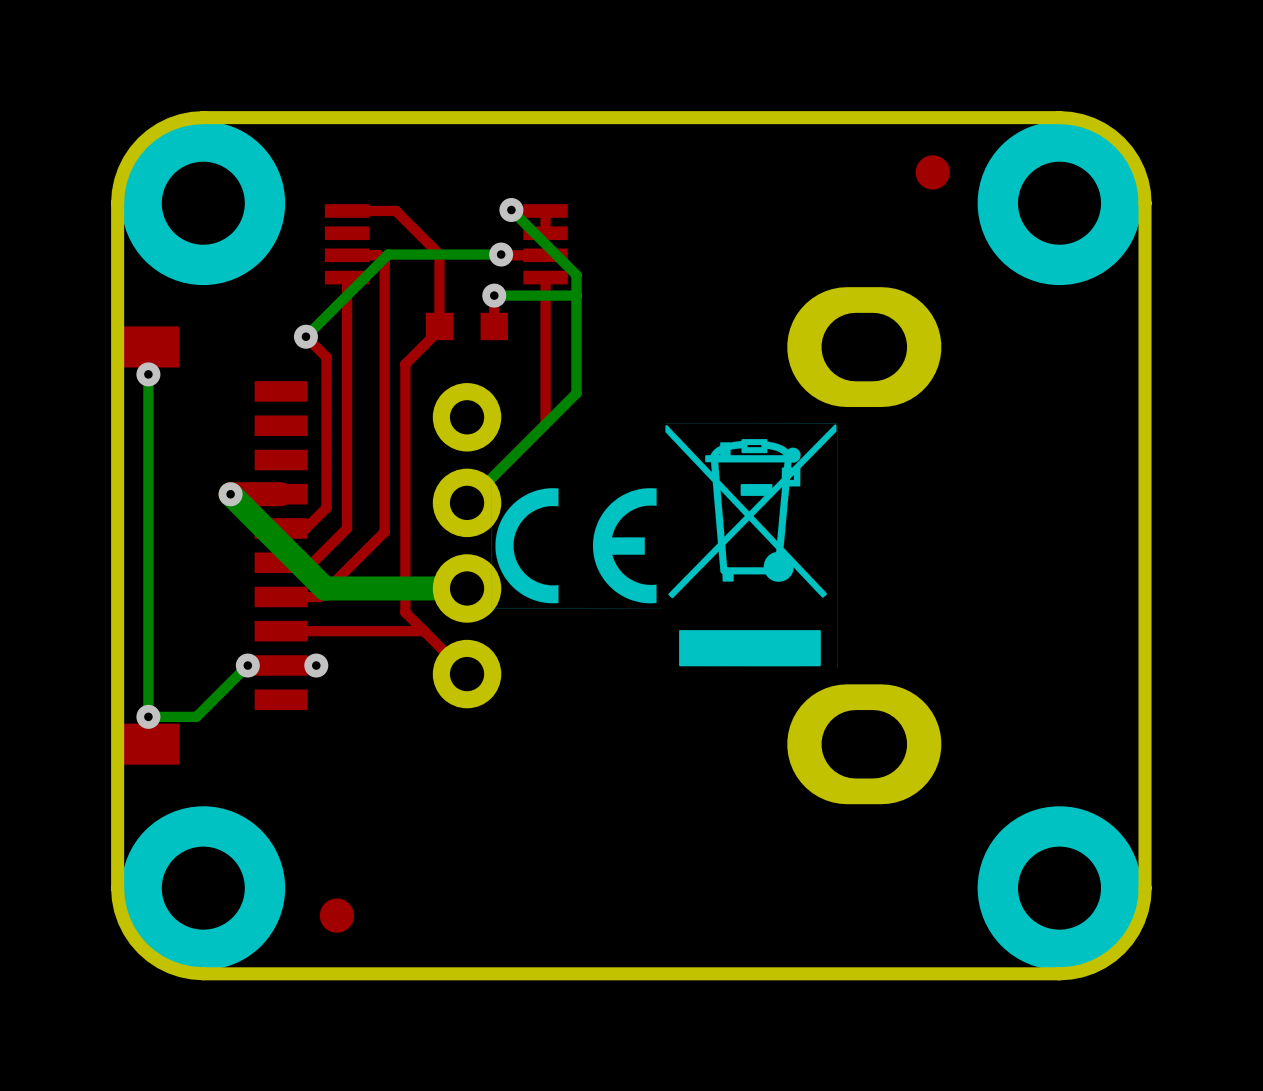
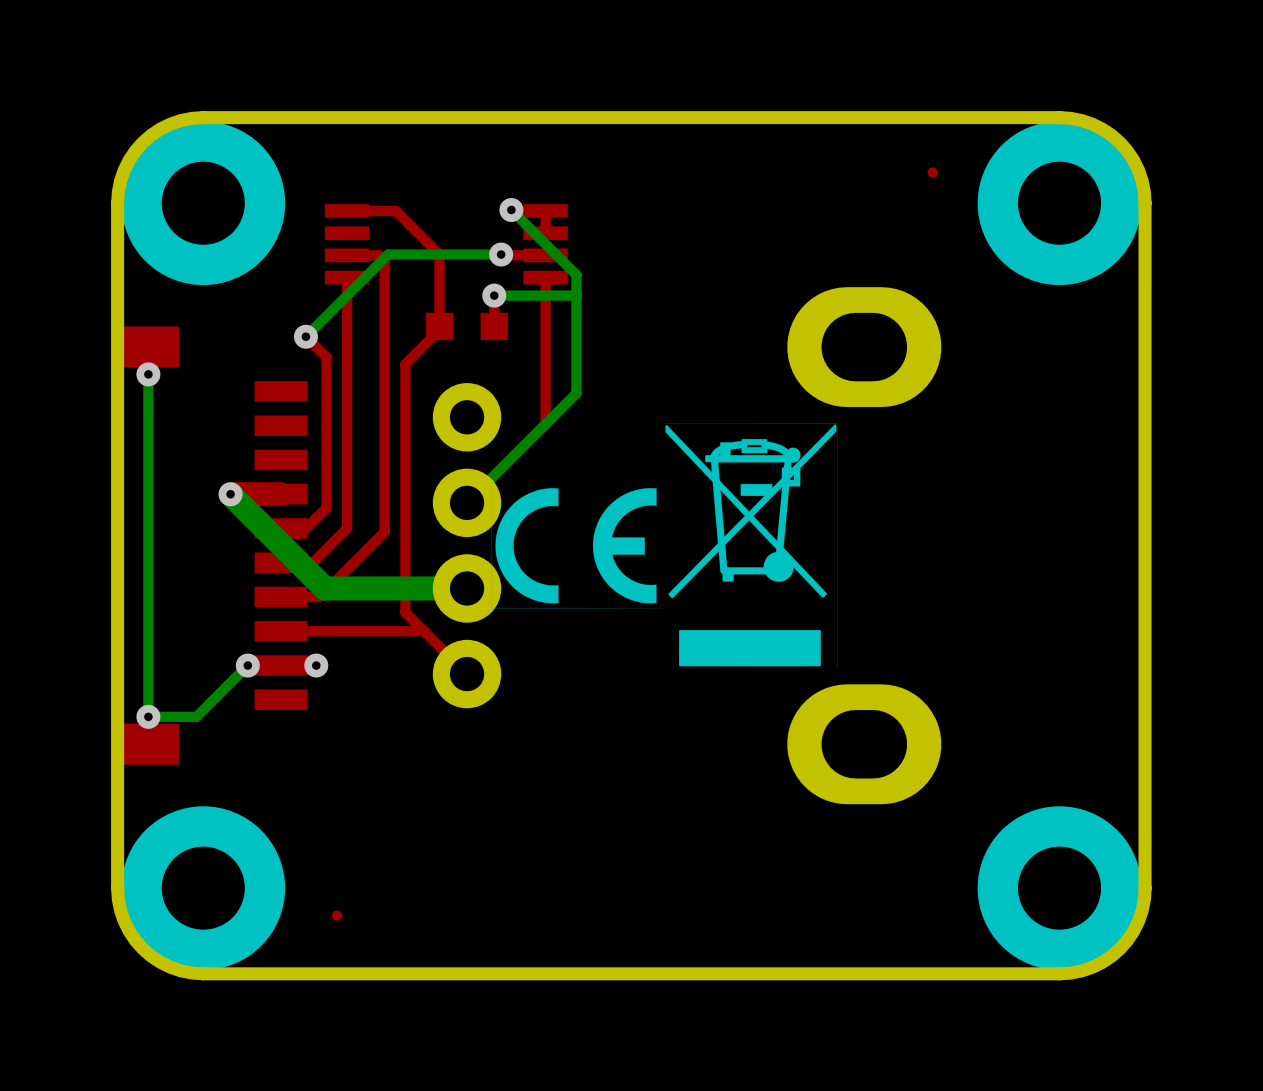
part footprint: [915, 155, 950, 190] -> [927, 167, 938, 178]
part footprint: [319, 898, 355, 933] -> [331, 910, 343, 921]

